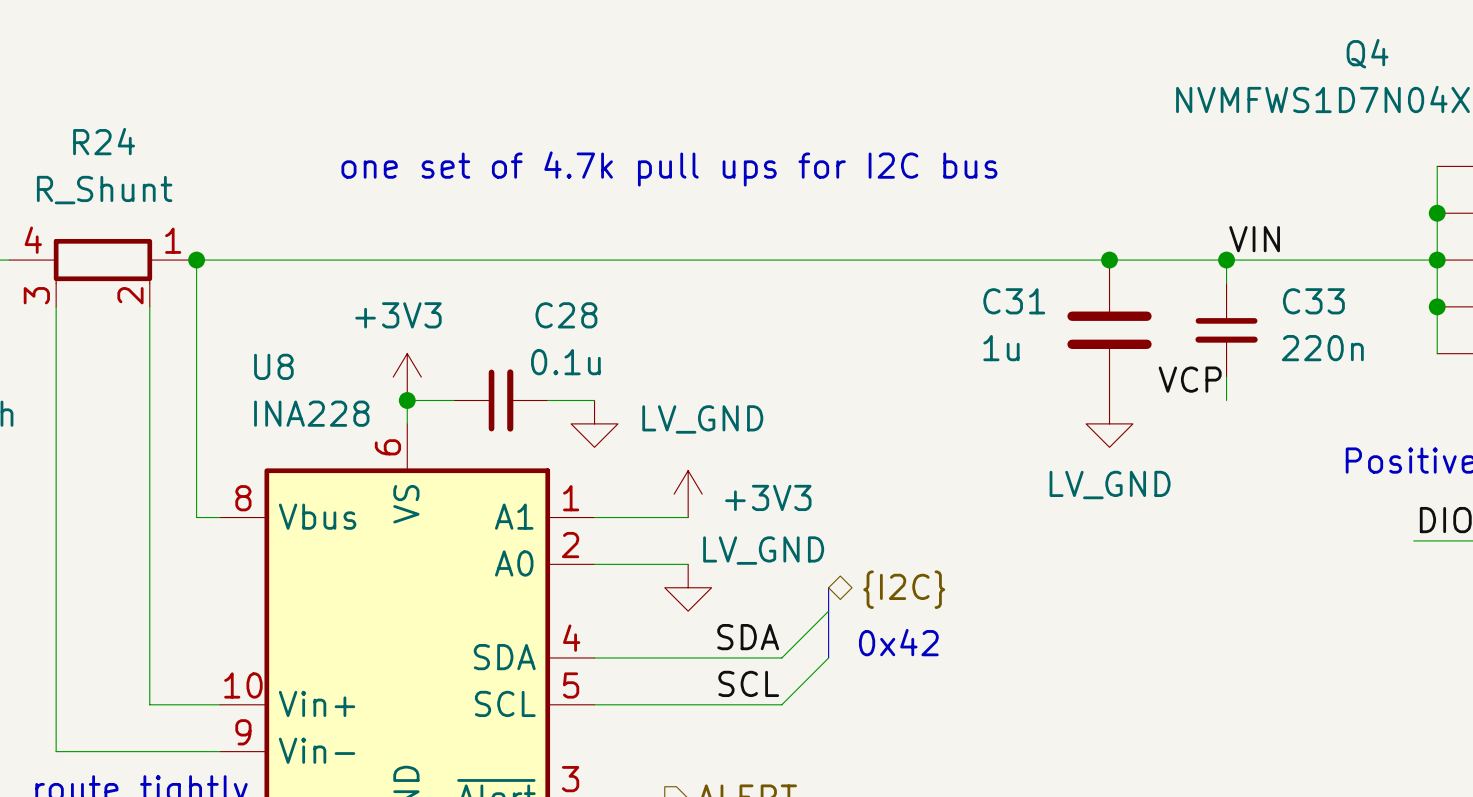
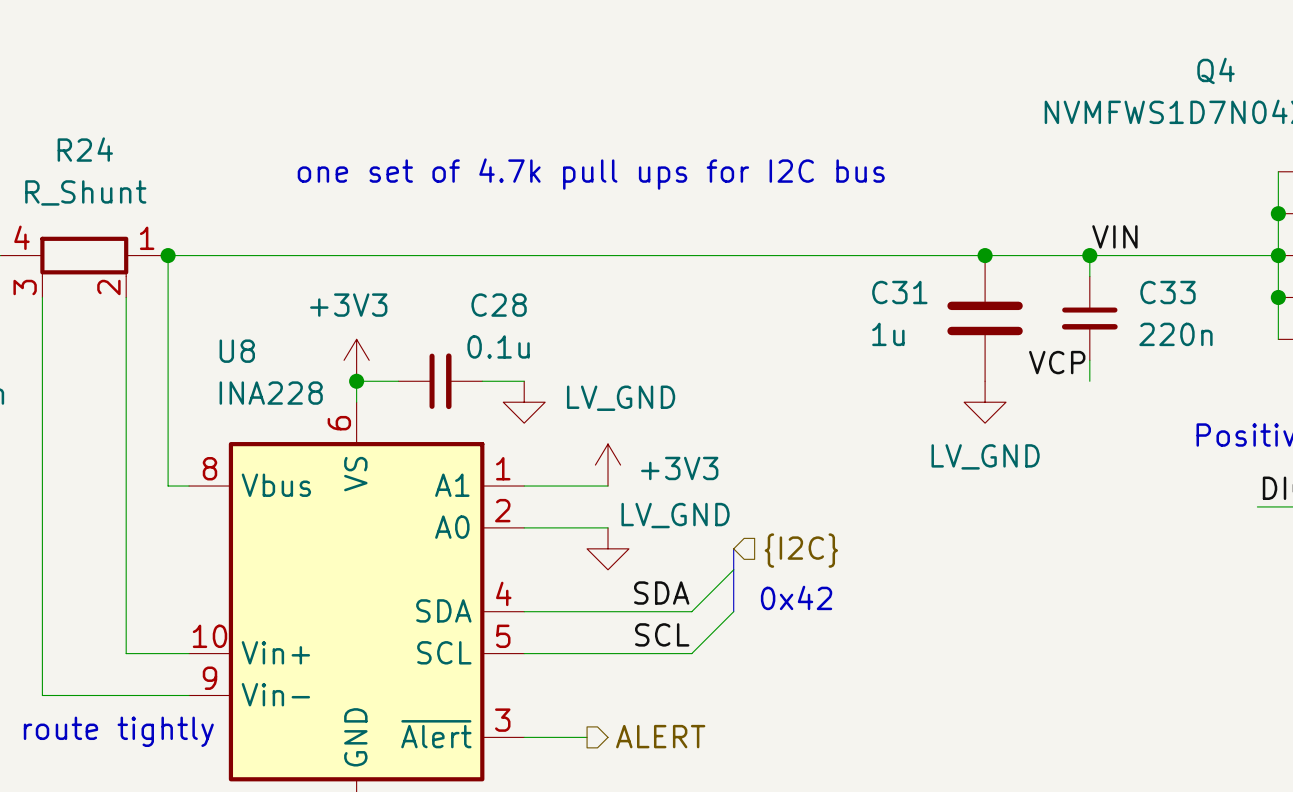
hierarchical label shape: bidirectional (904, 589) -> input (801, 550)

